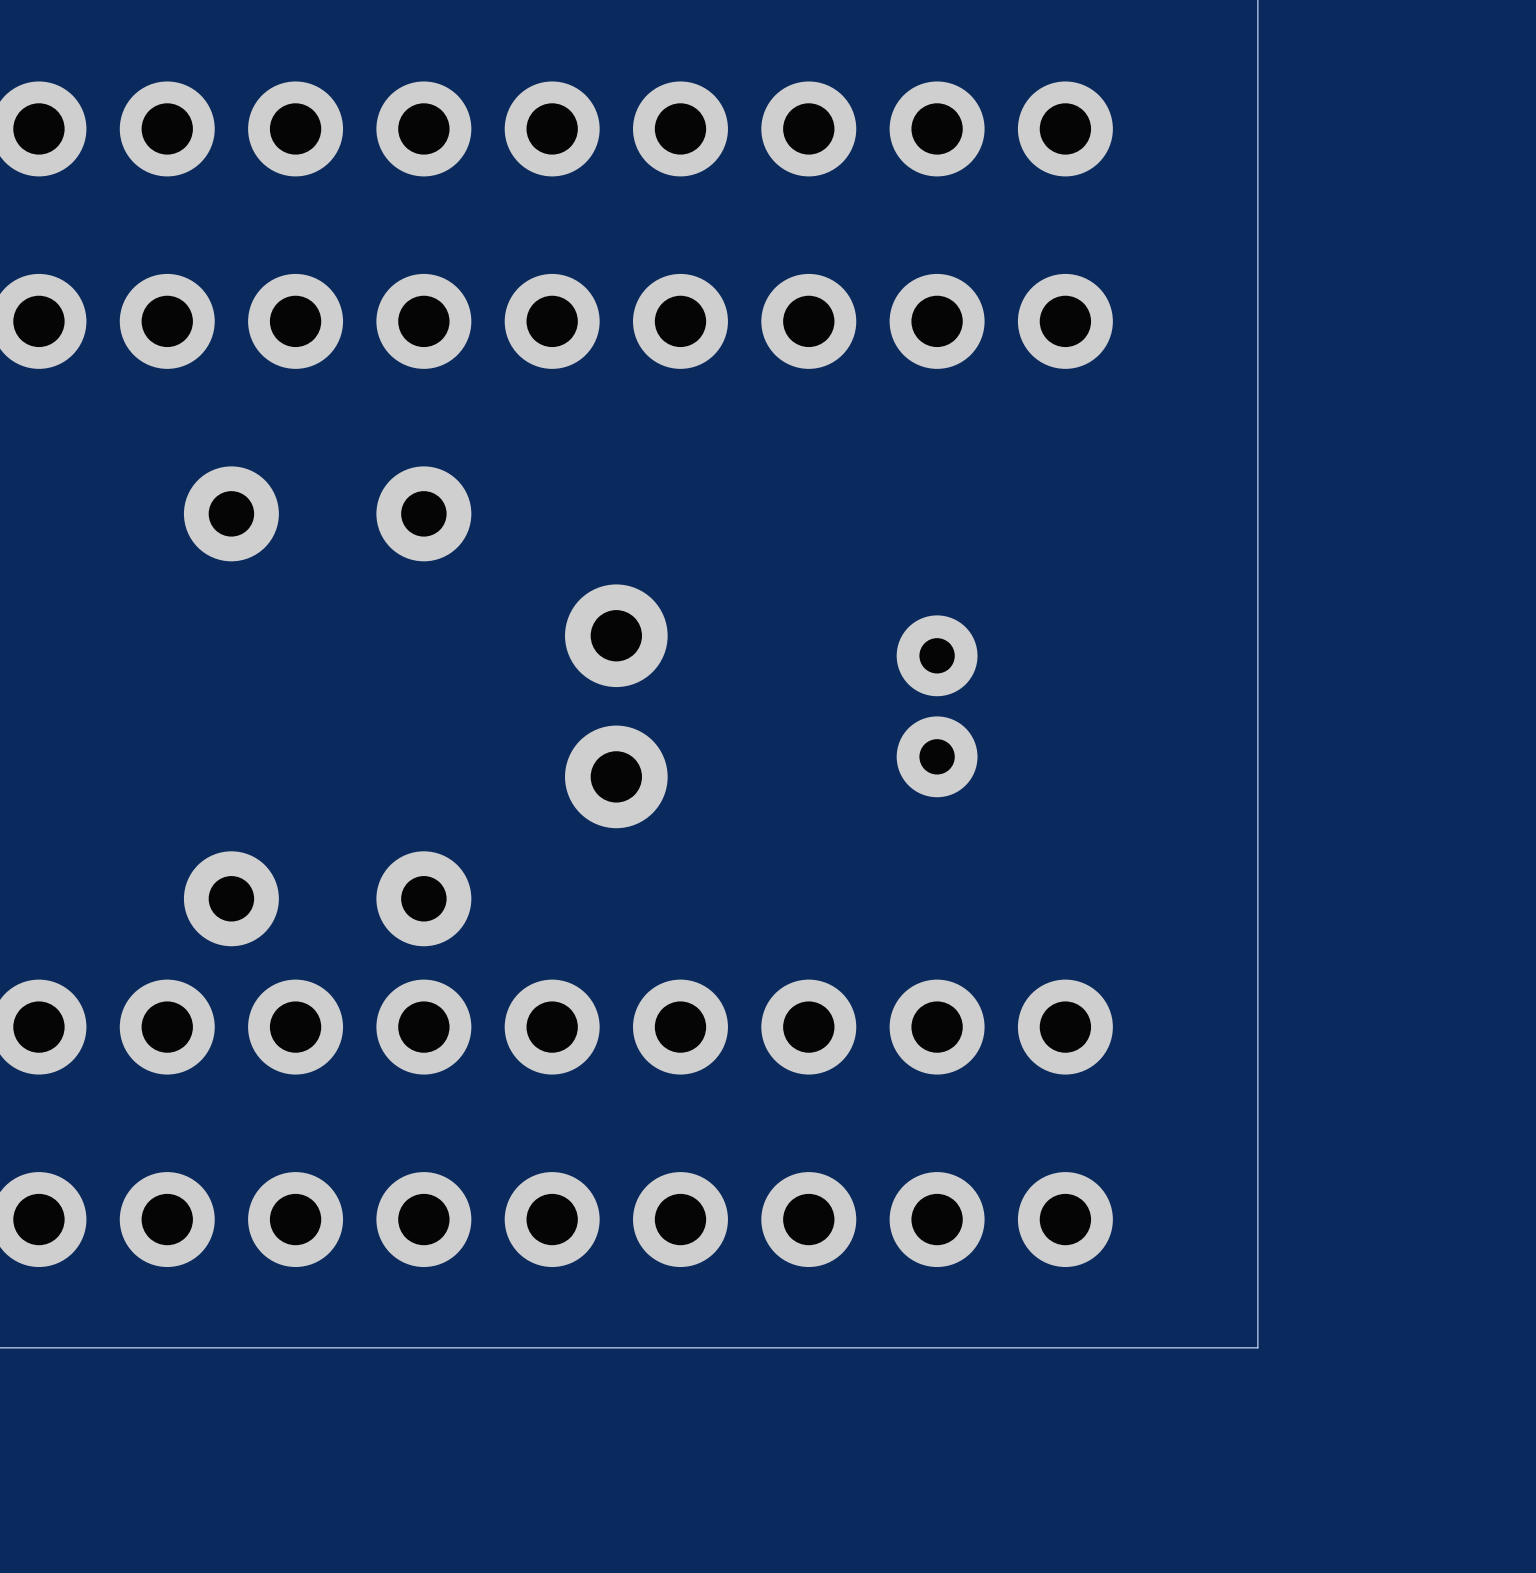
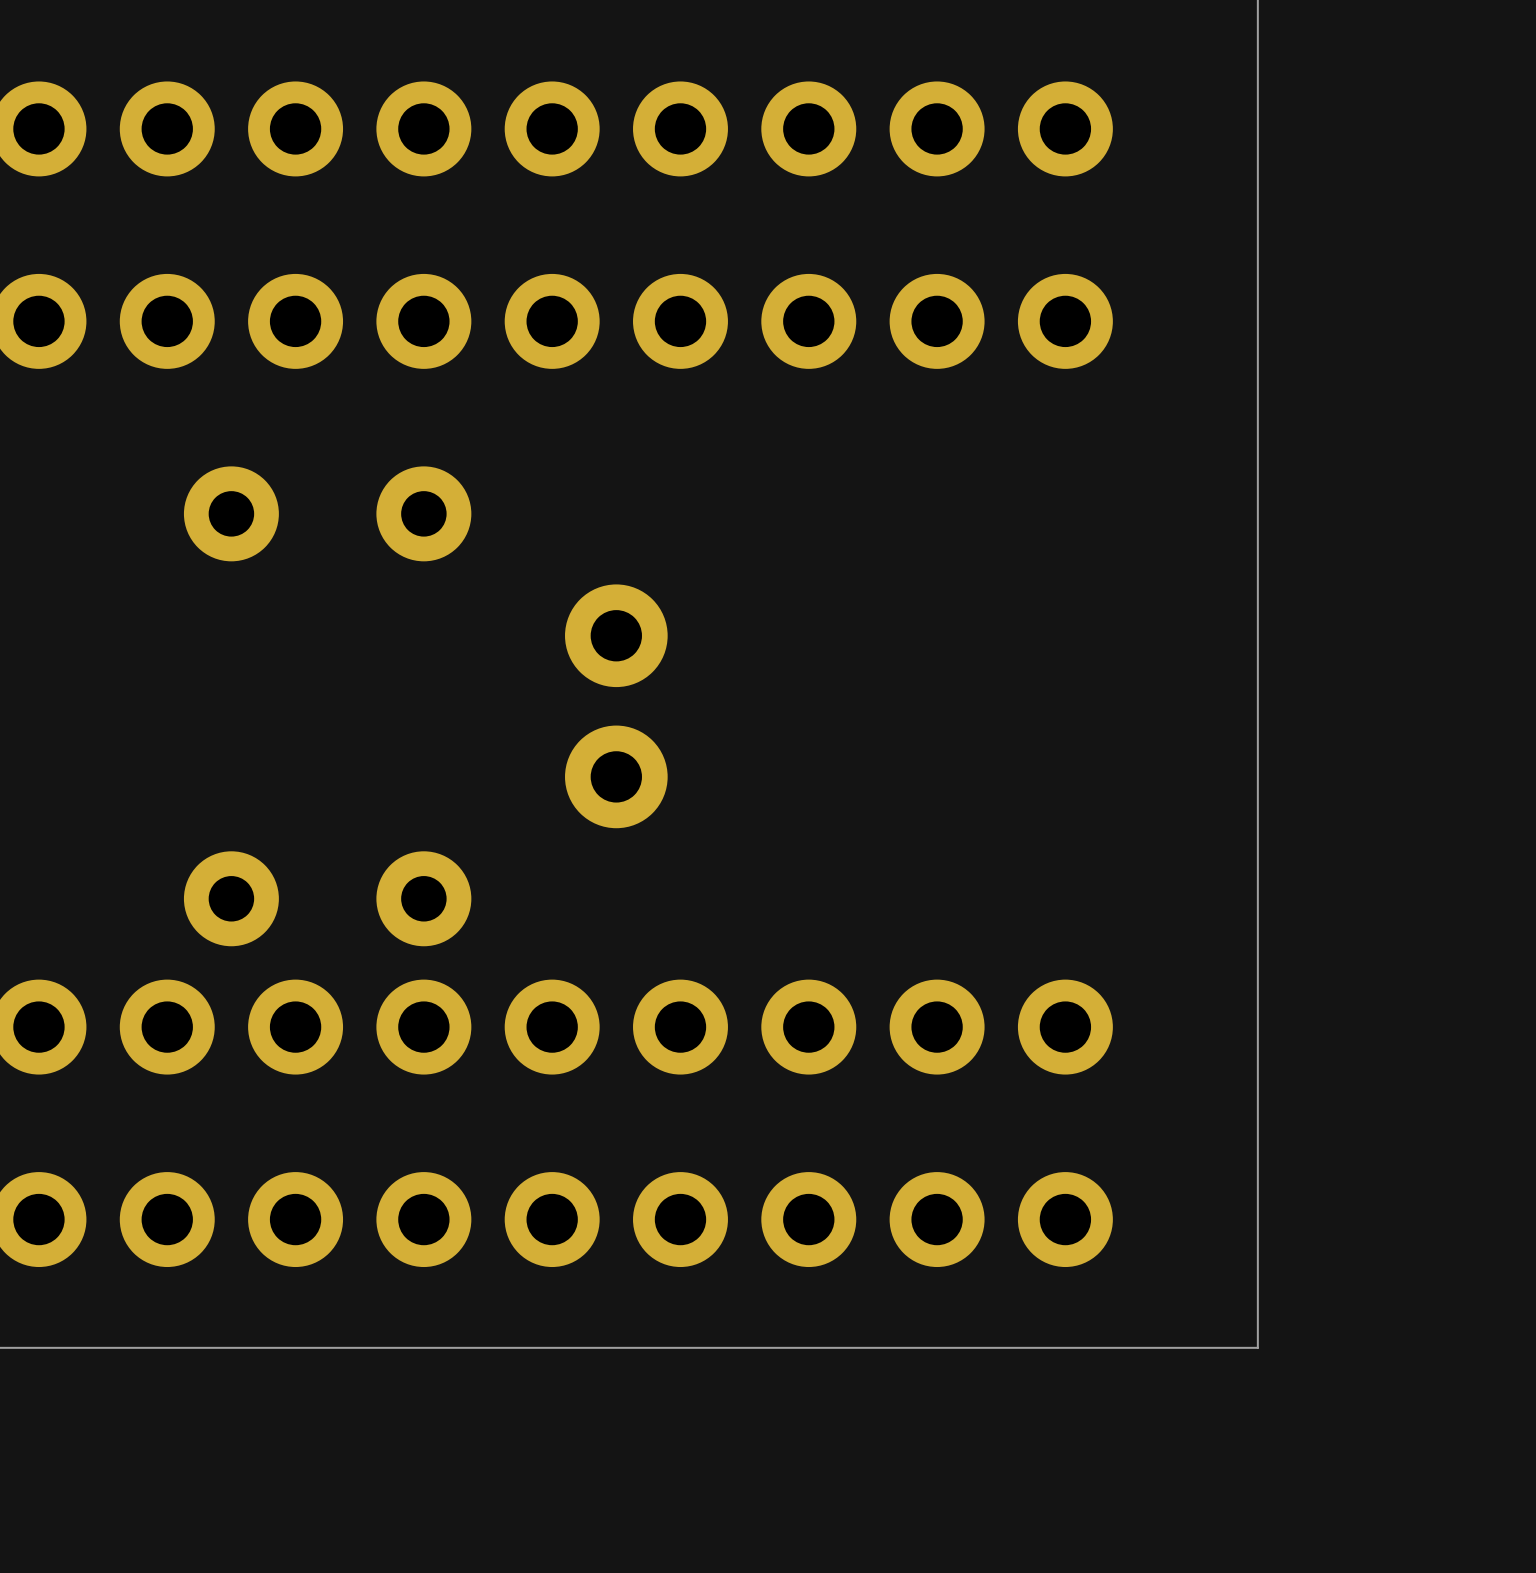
part: (937, 706) -> none

